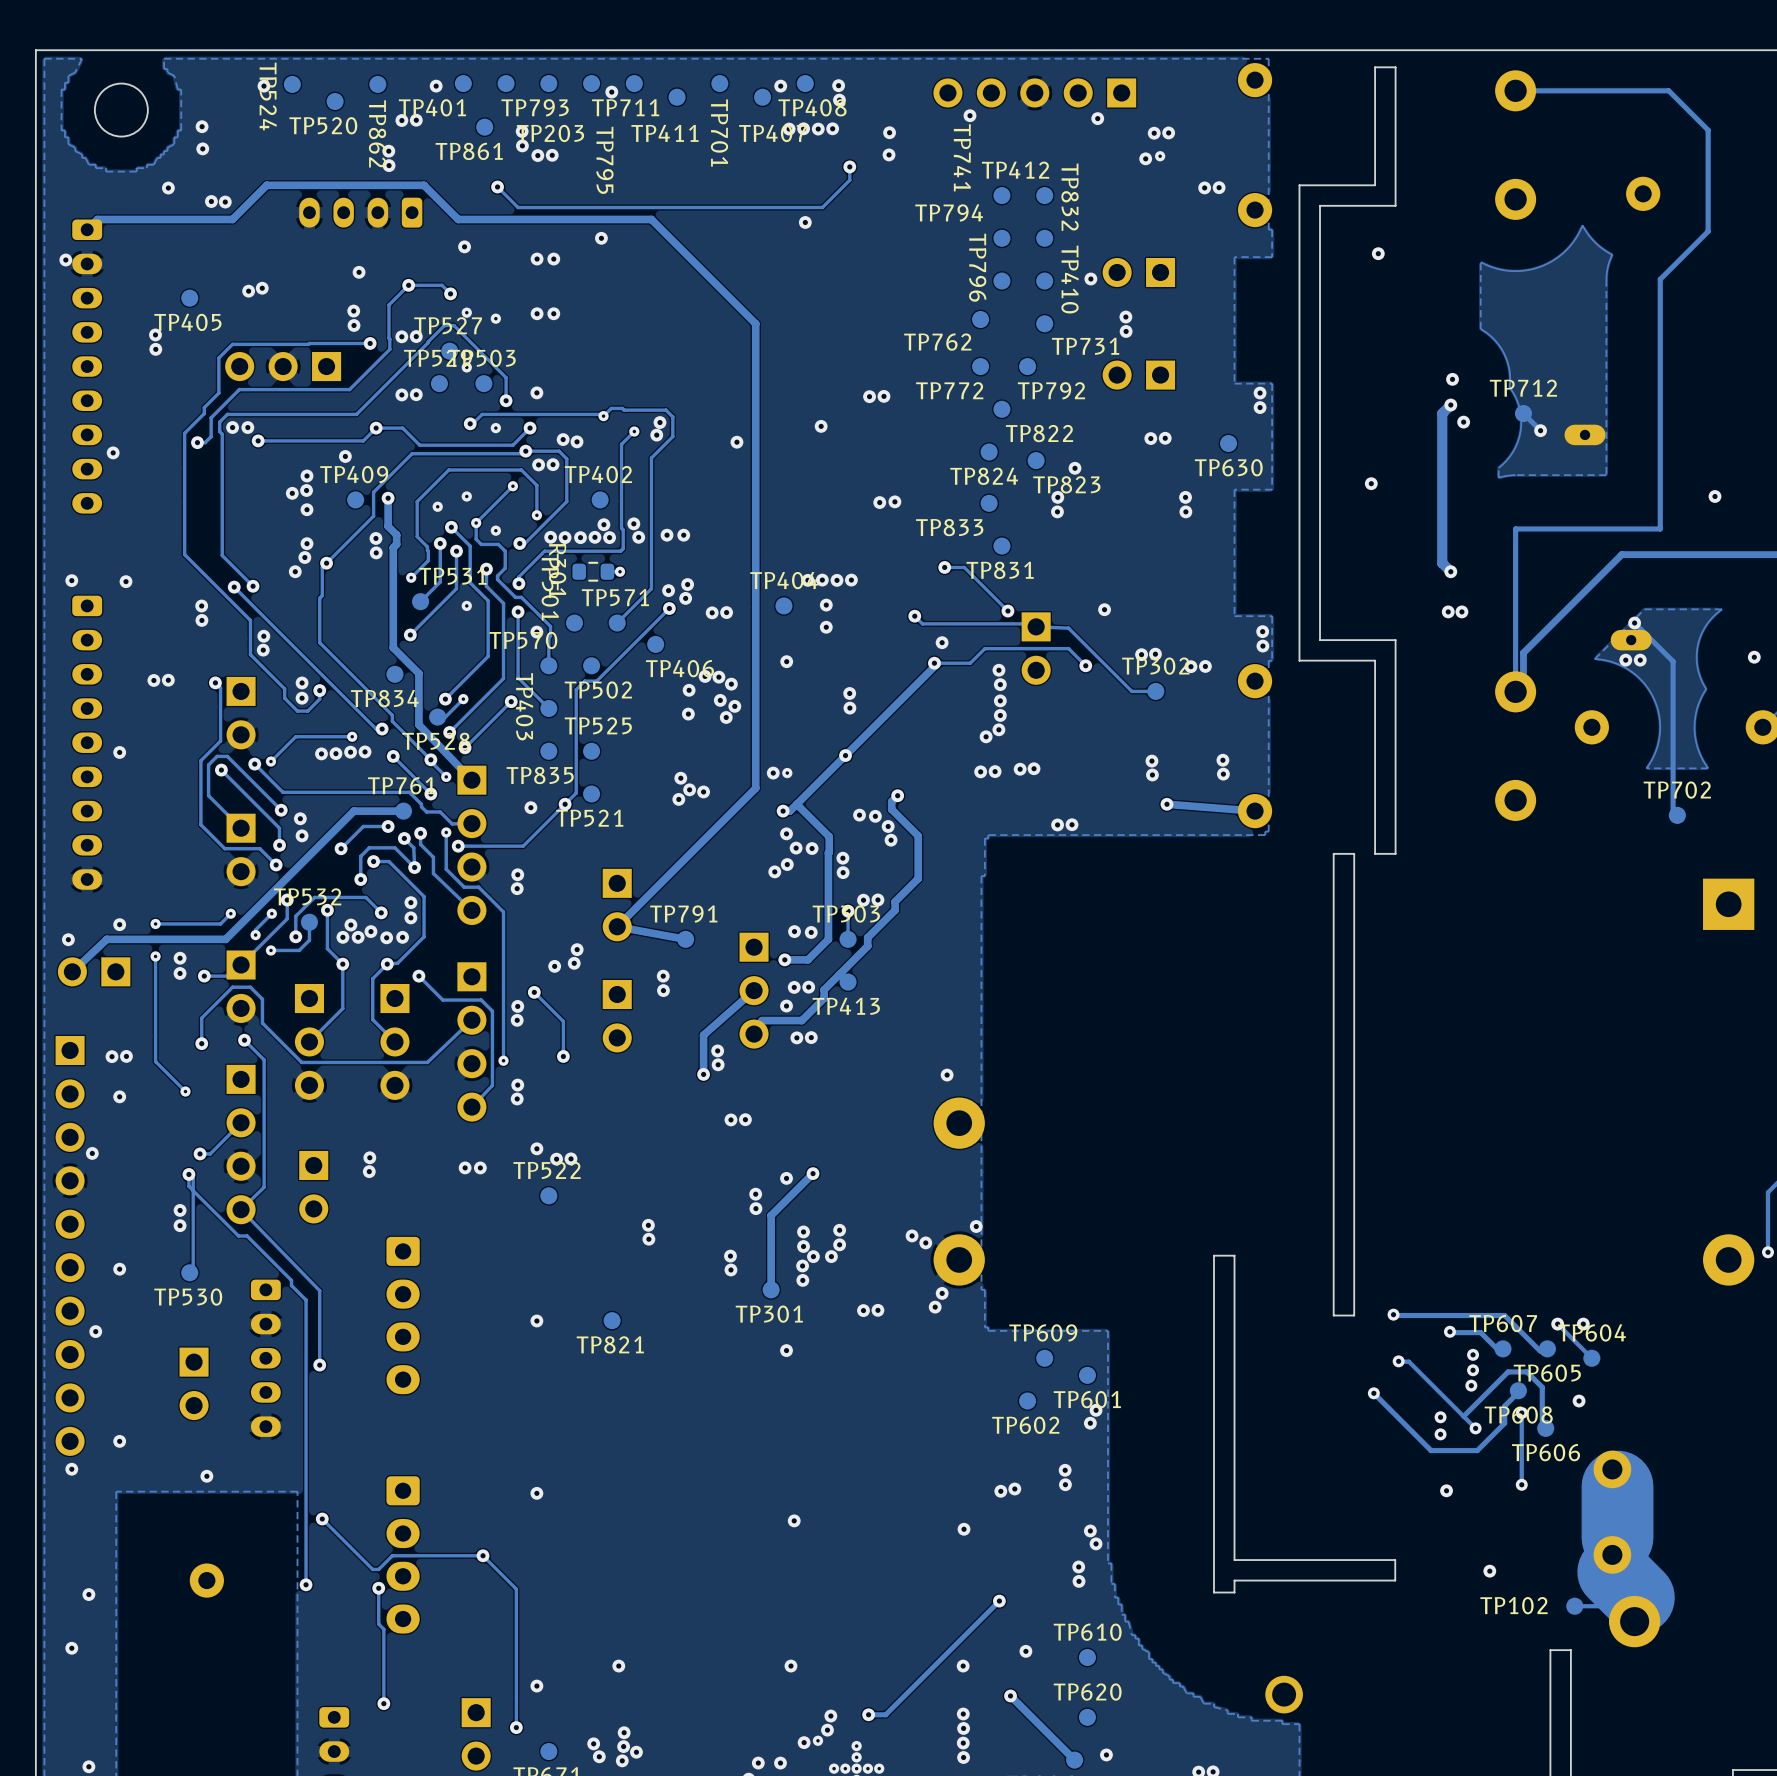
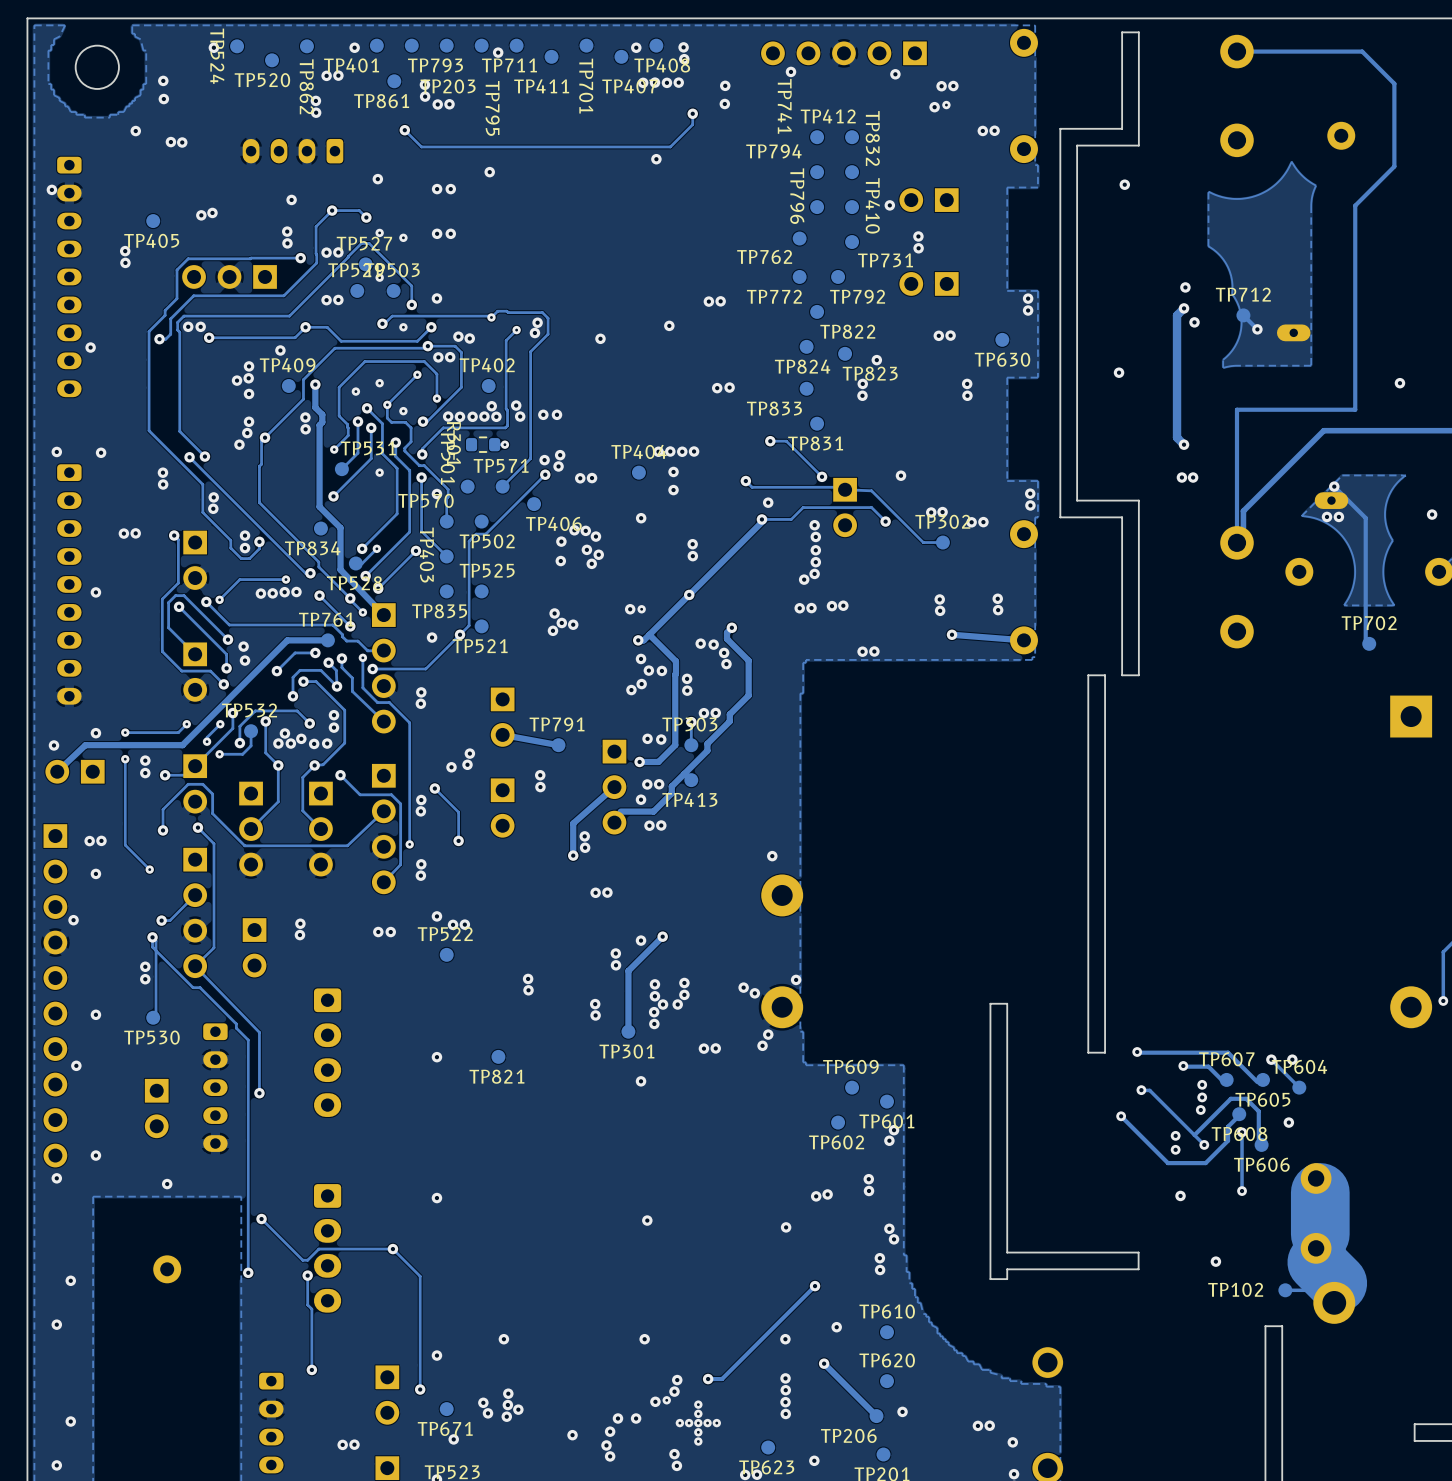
track: (87, 229) (97, 219) (232, 219) (266, 185) (424, 185) (458, 219) (651, 219) (755, 323) (755, 788) (617, 926) -> none

